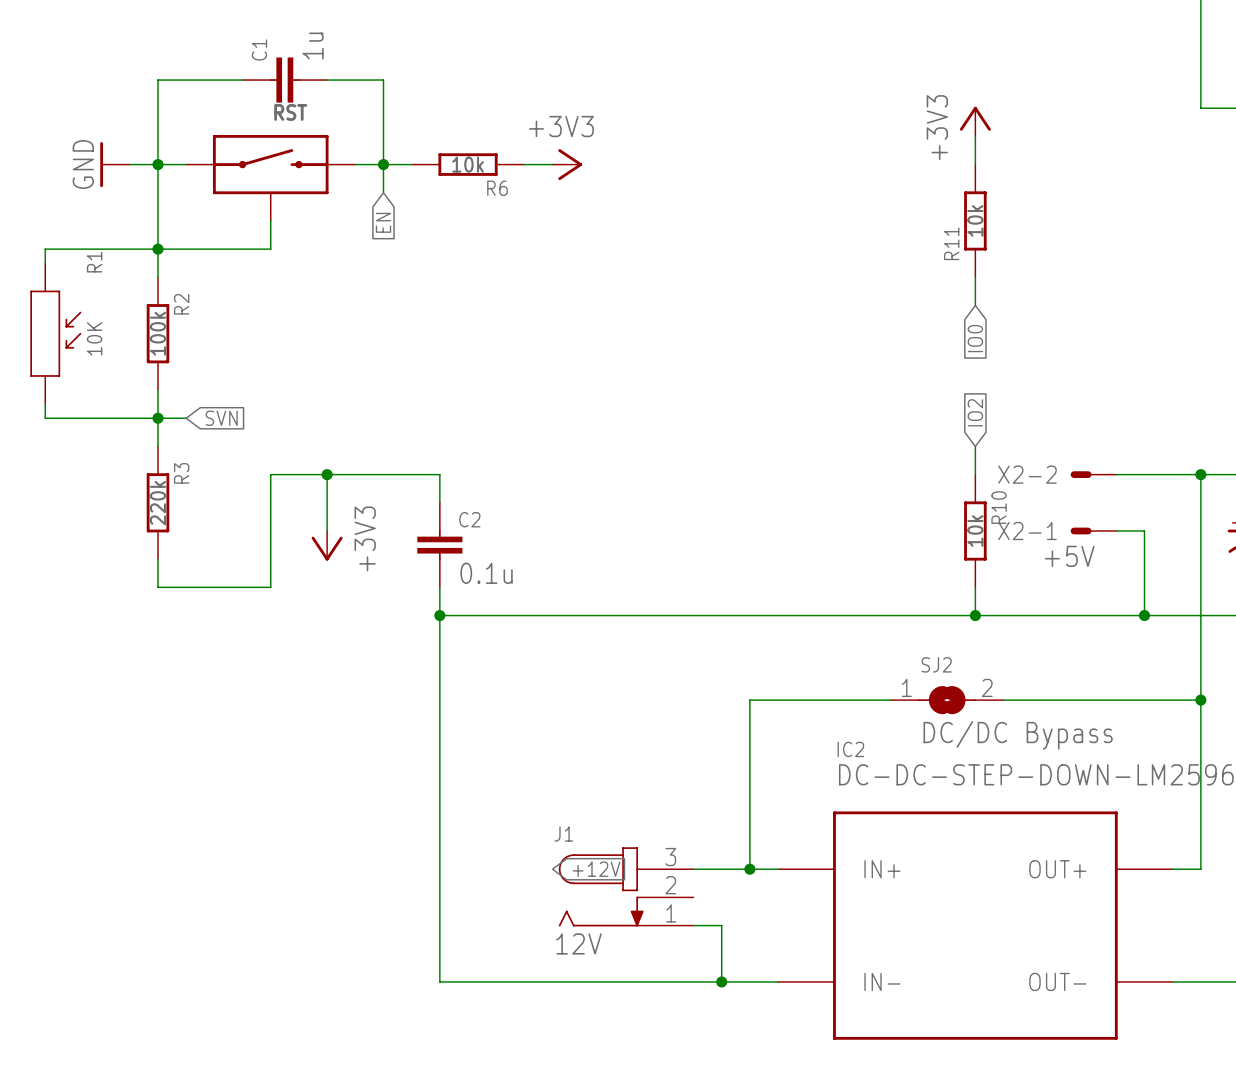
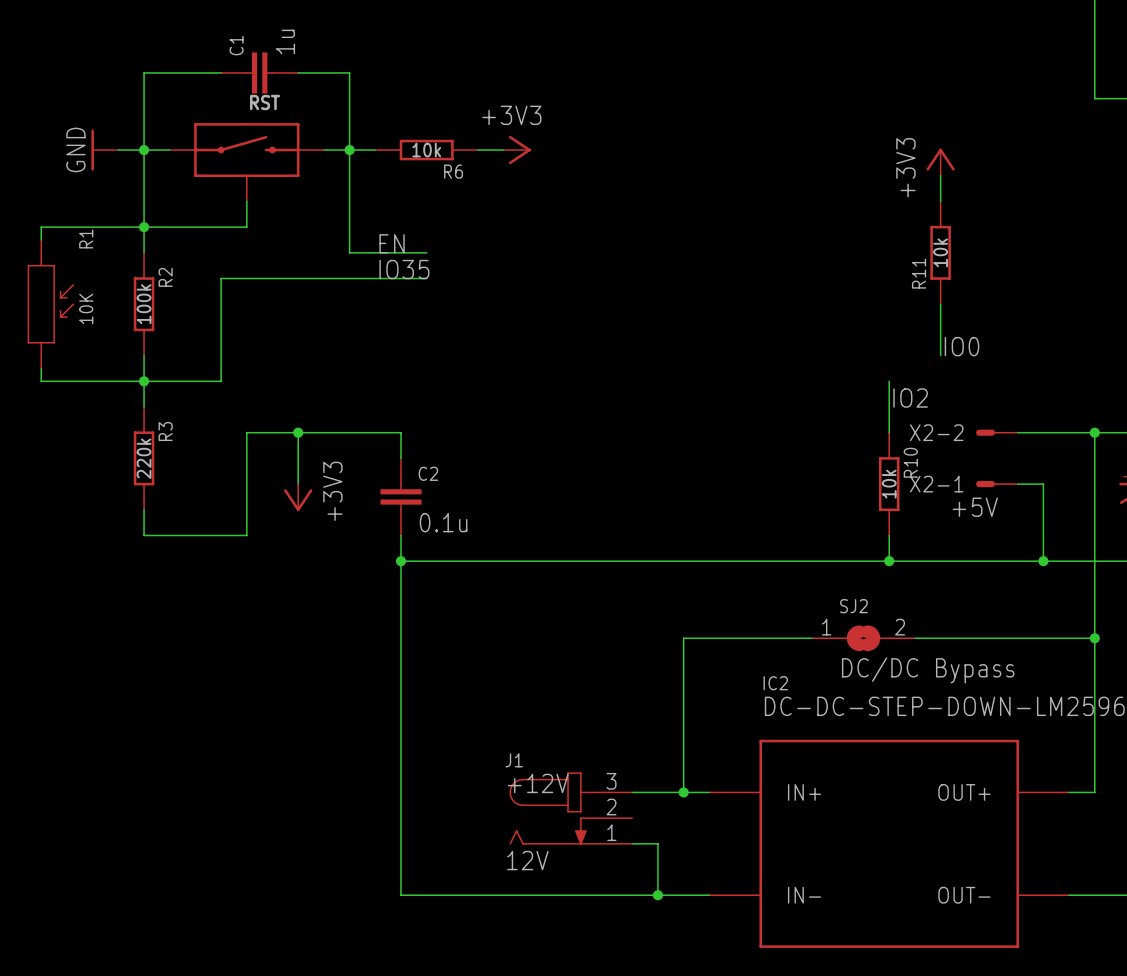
power symbol position: +3V3 (975, 121) -> +3V3 (940, 162)
wire: (975, 136) (975, 164) -> (940, 175) (940, 201)
wire: none -> (349, 175) (349, 252) (426, 252)
R11 position: (975, 220) -> (940, 252)
global label: EN (383, 222) -> none
label: none -> EN (392, 243)
wire: (975, 277) (975, 305) -> (889, 381) (889, 407)
label: none -> IO35 (404, 269)
wire: none -> (426, 278) (221, 278) (221, 381) (169, 381)
wire: none -> (940, 304) (940, 355)
global label: IO0 (975, 338) -> none
label: none -> IO0 (961, 346)
global label: IO2 (975, 412) -> none
global label: SVN (221, 418) -> none
label: none -> IO2 (910, 398)
label: none -> +12V (538, 783)
global label: +12V (596, 869) -> none

